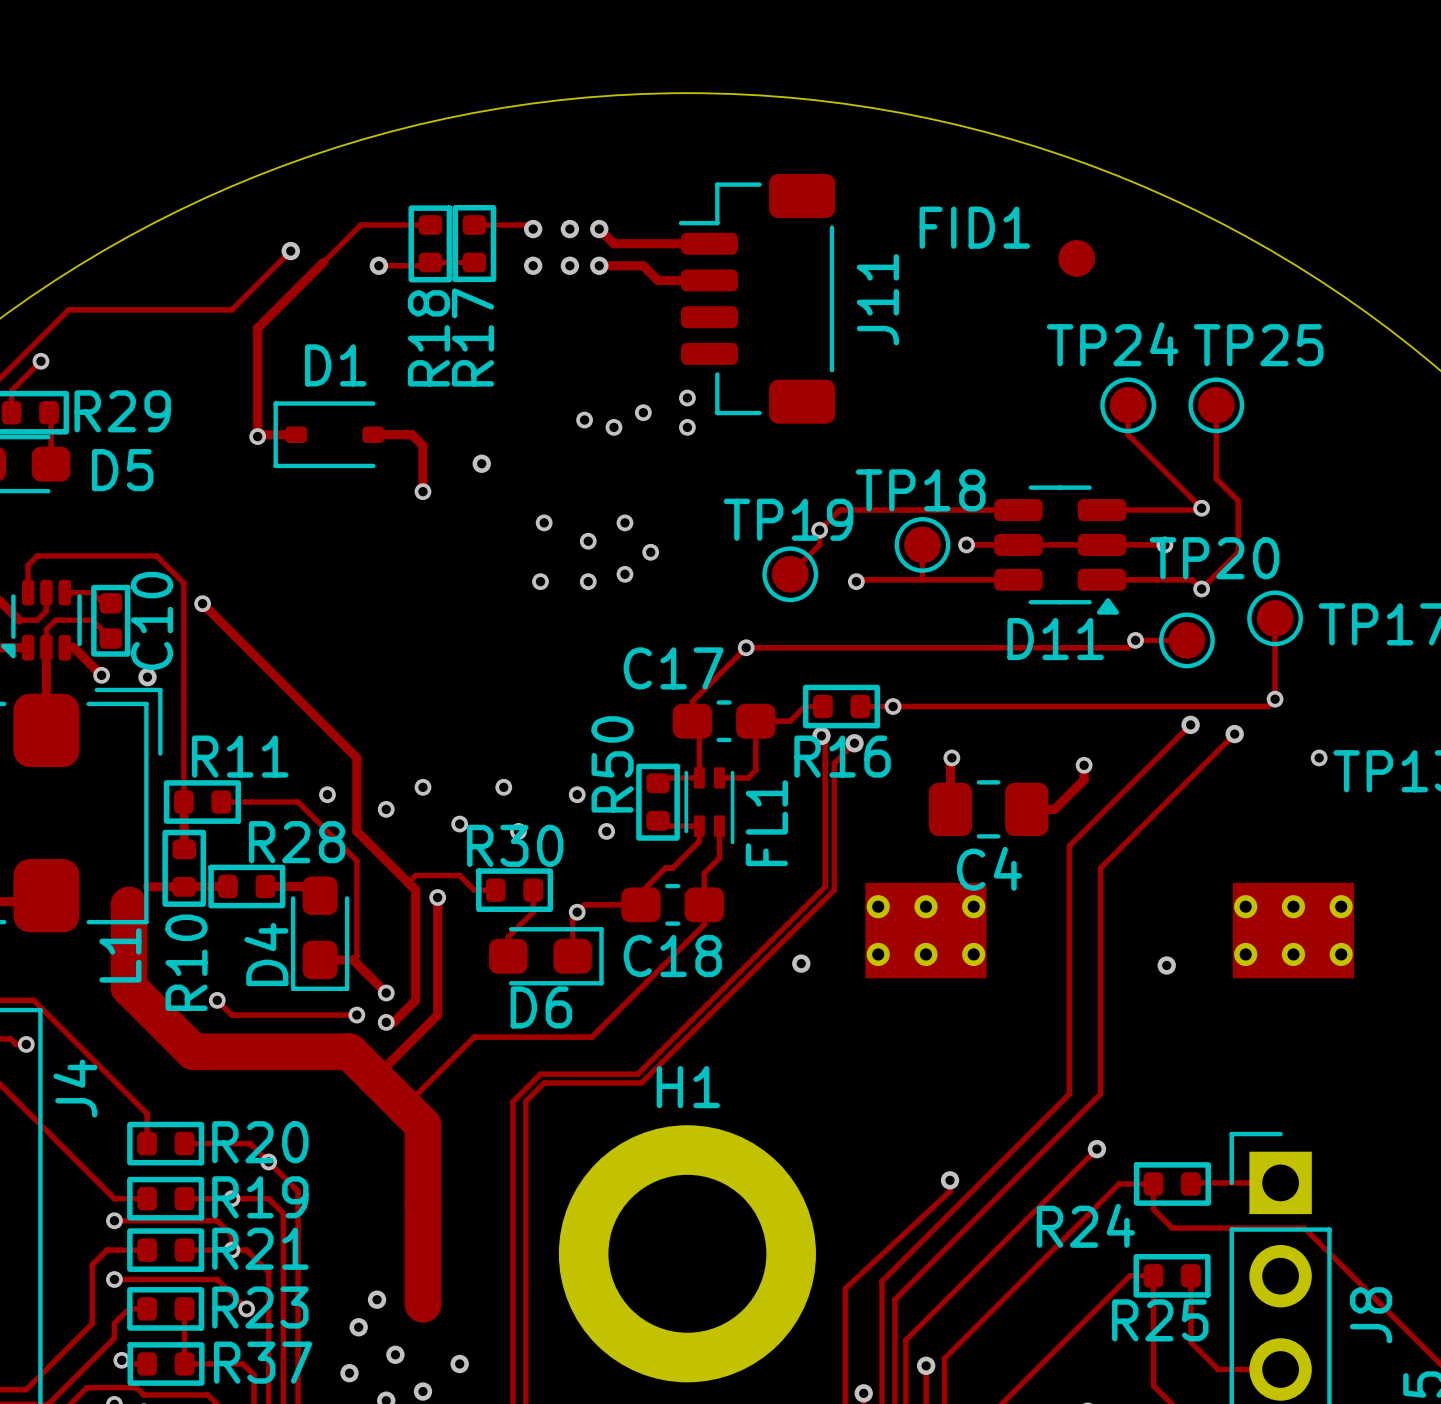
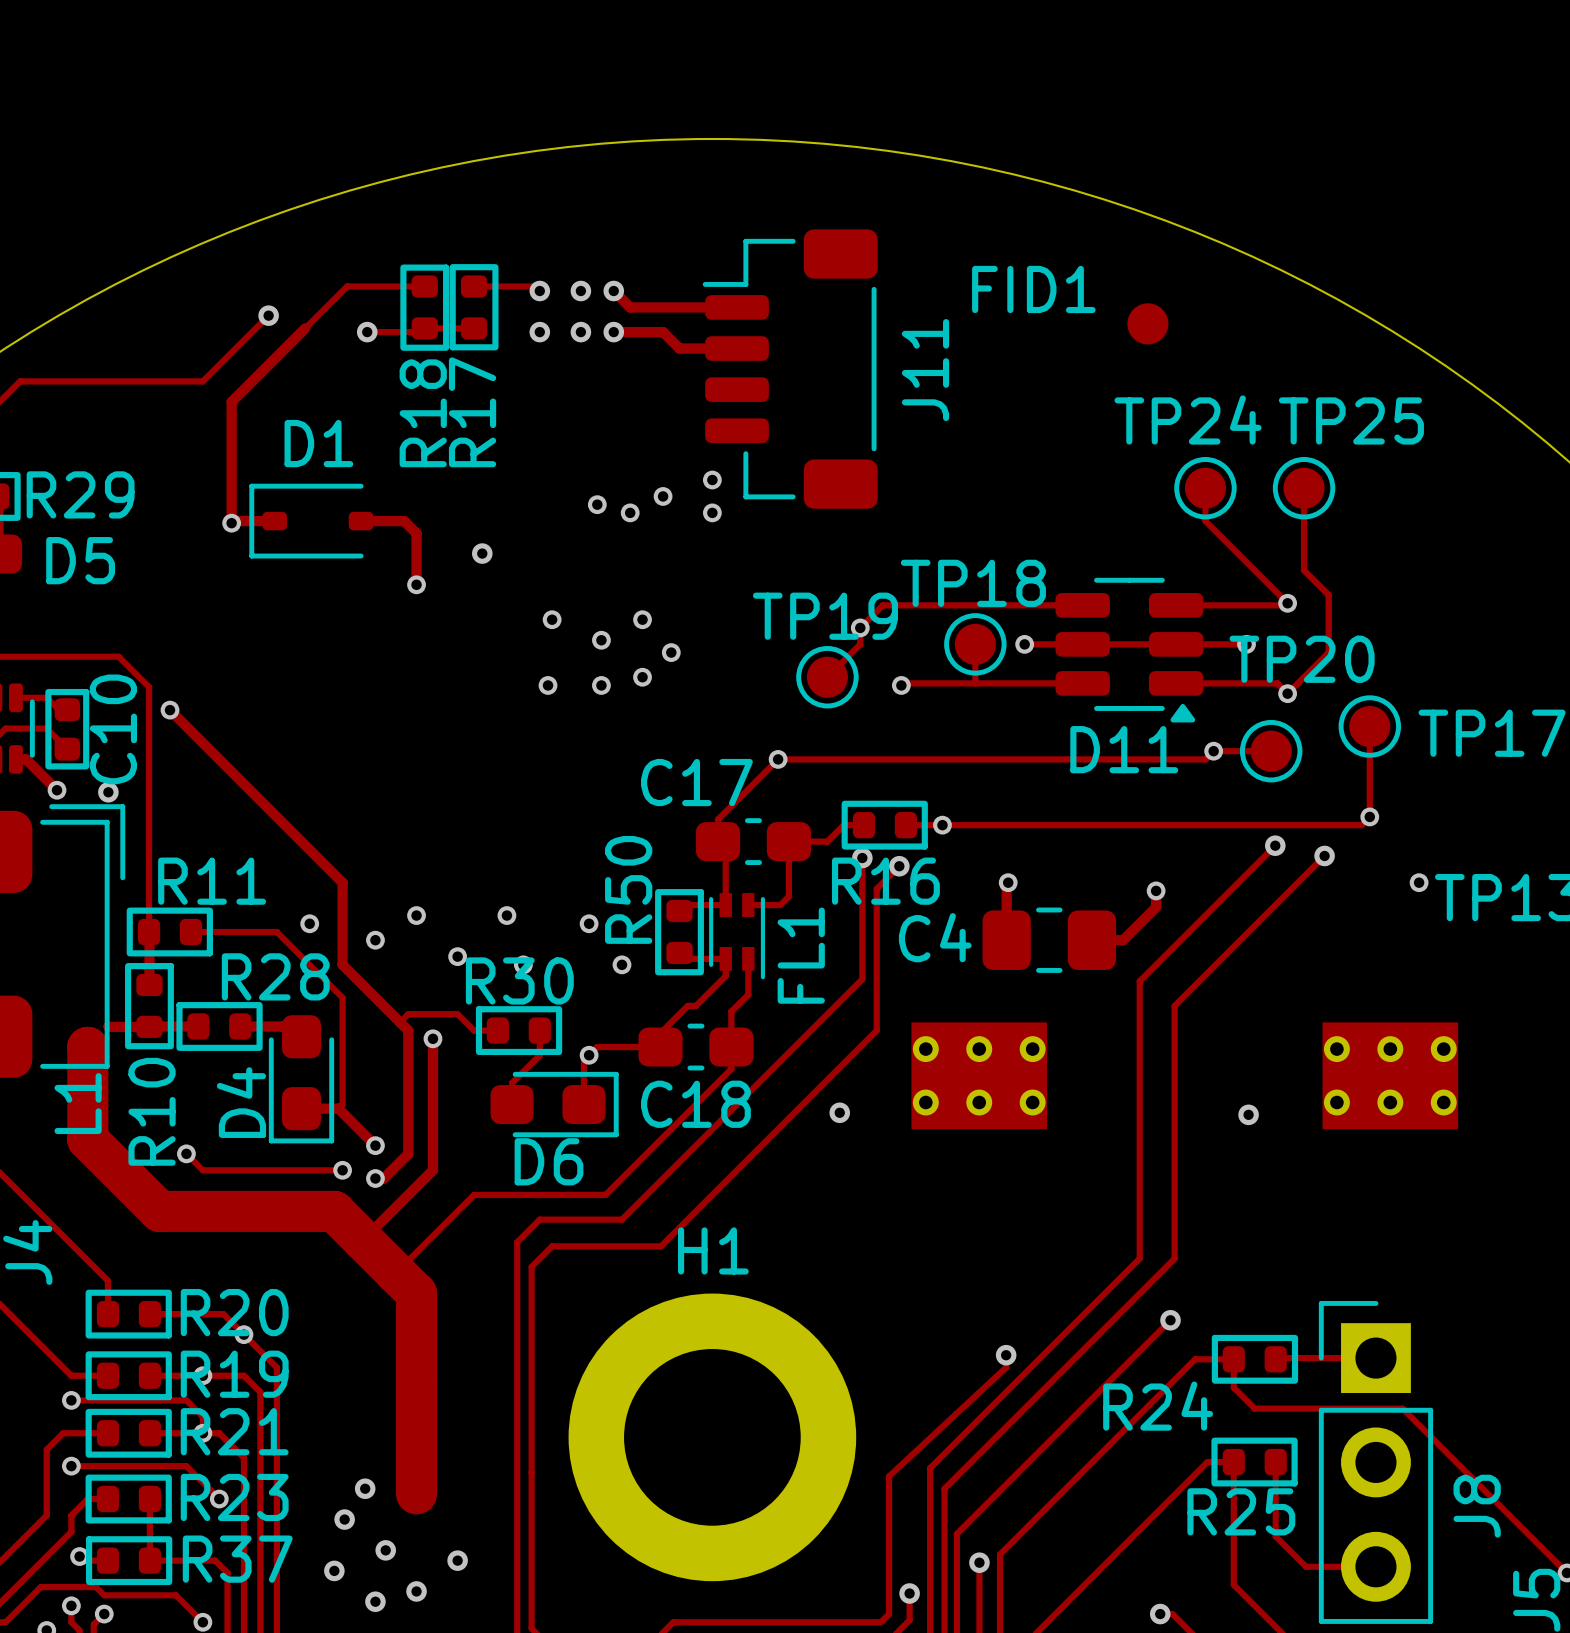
track: (825, 739) (825, 886) (637, 1074) (540, 1074) (512, 1101) -> (862, 858) (862, 979) (621, 1219) (539, 1219) (517, 1242) (517, 1267)
C4 name position: C4 (989, 868) -> C4 (935, 937)

